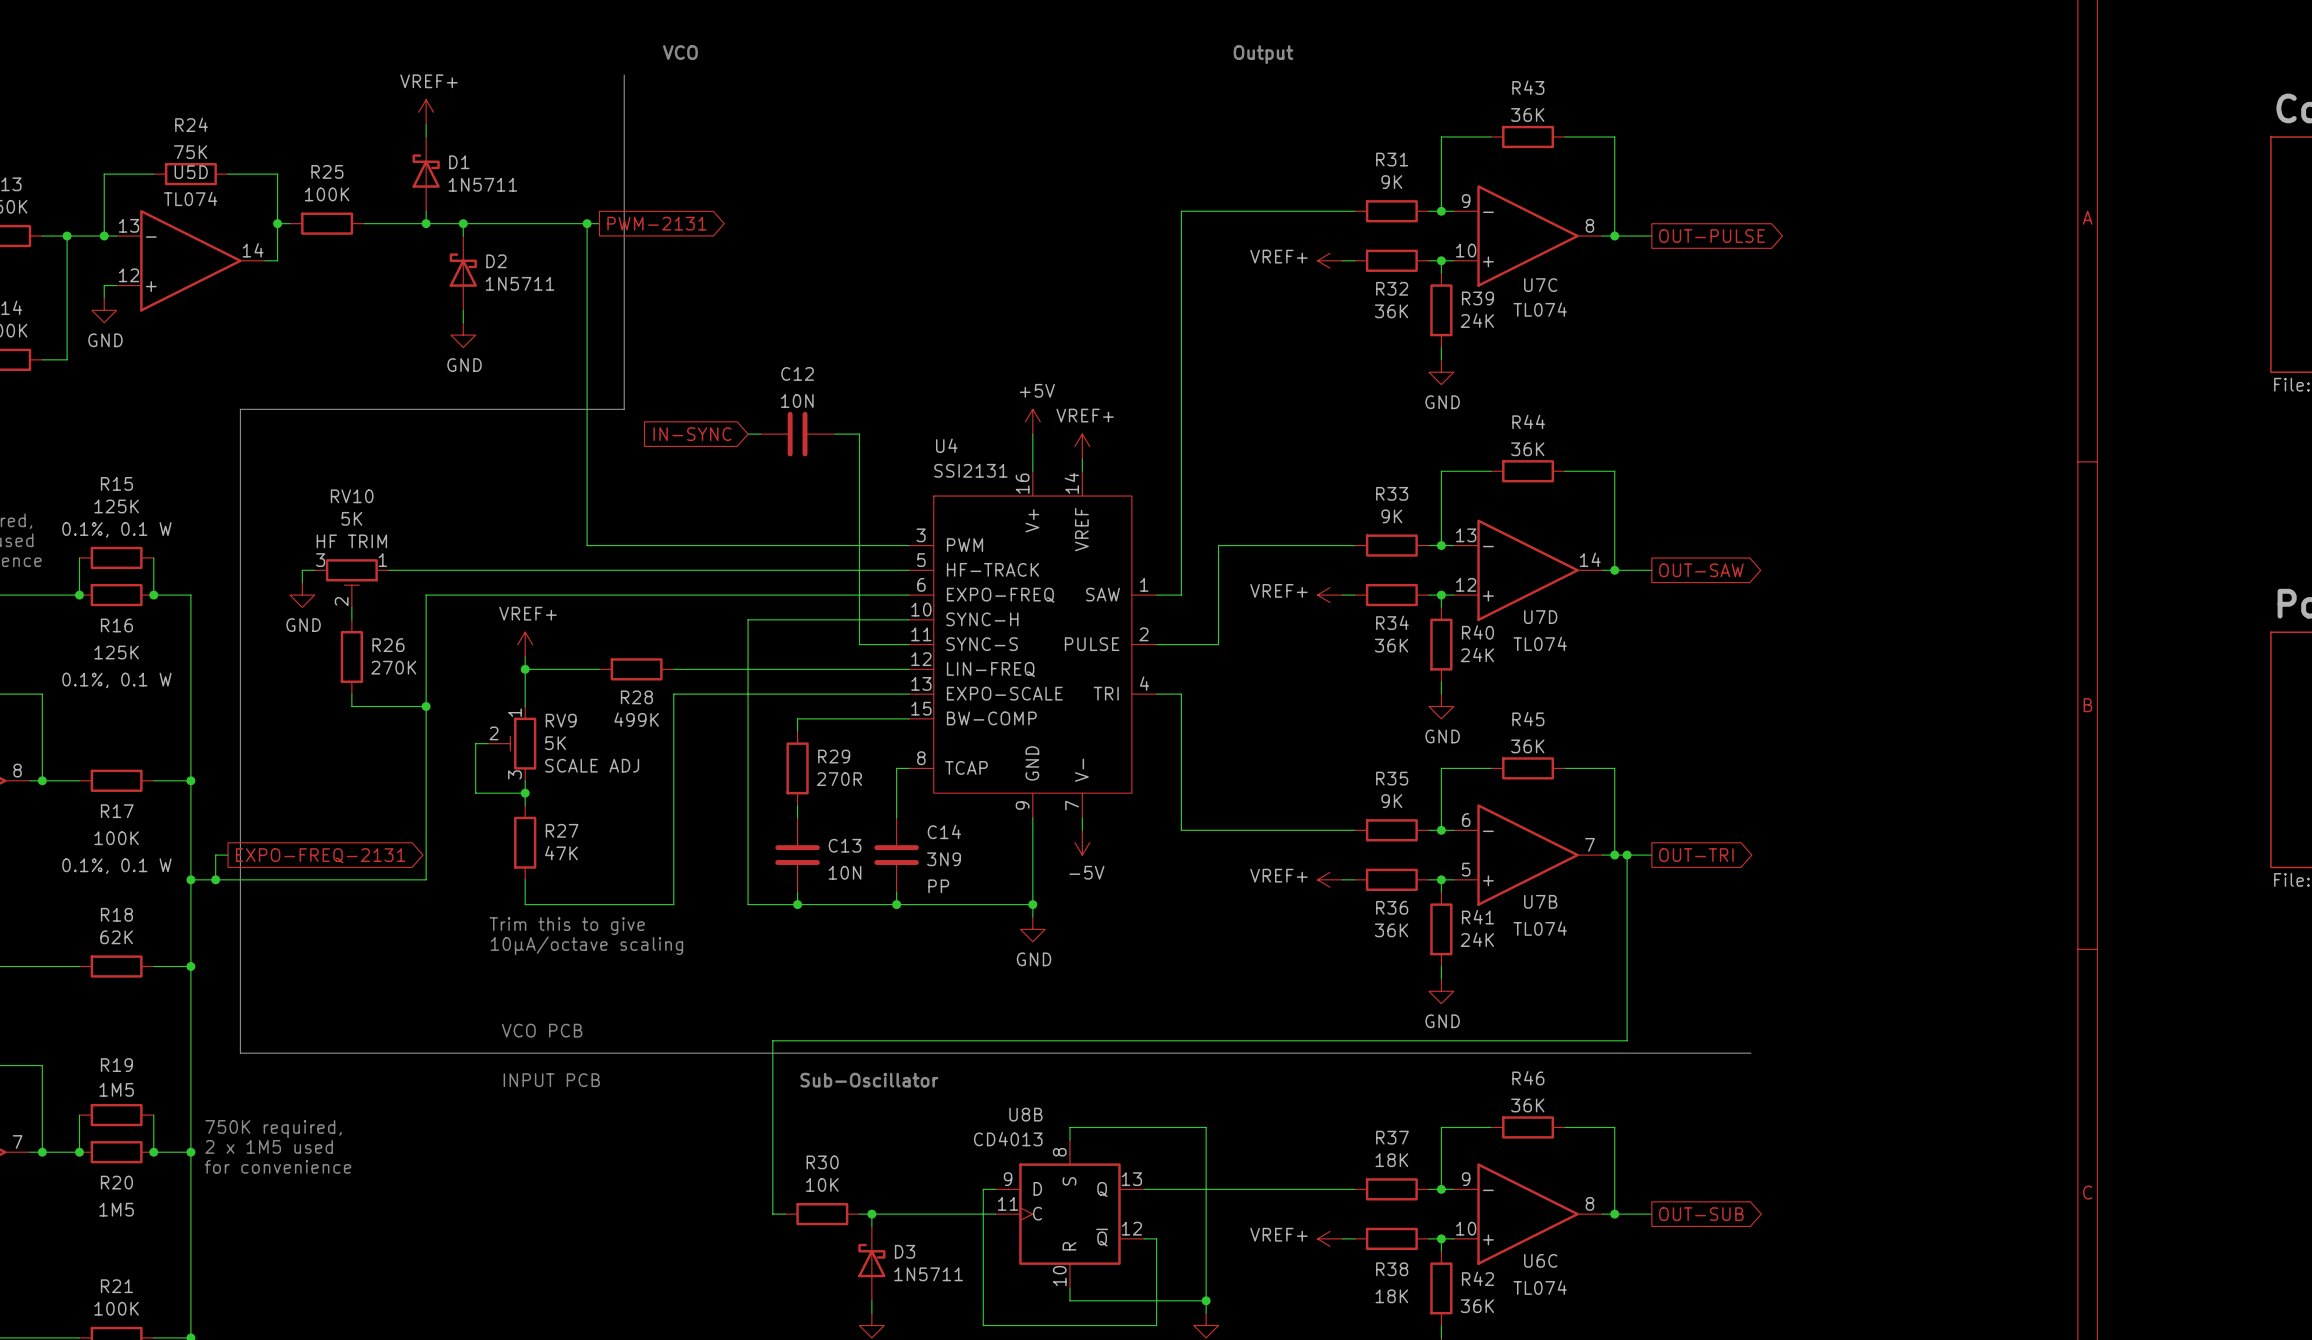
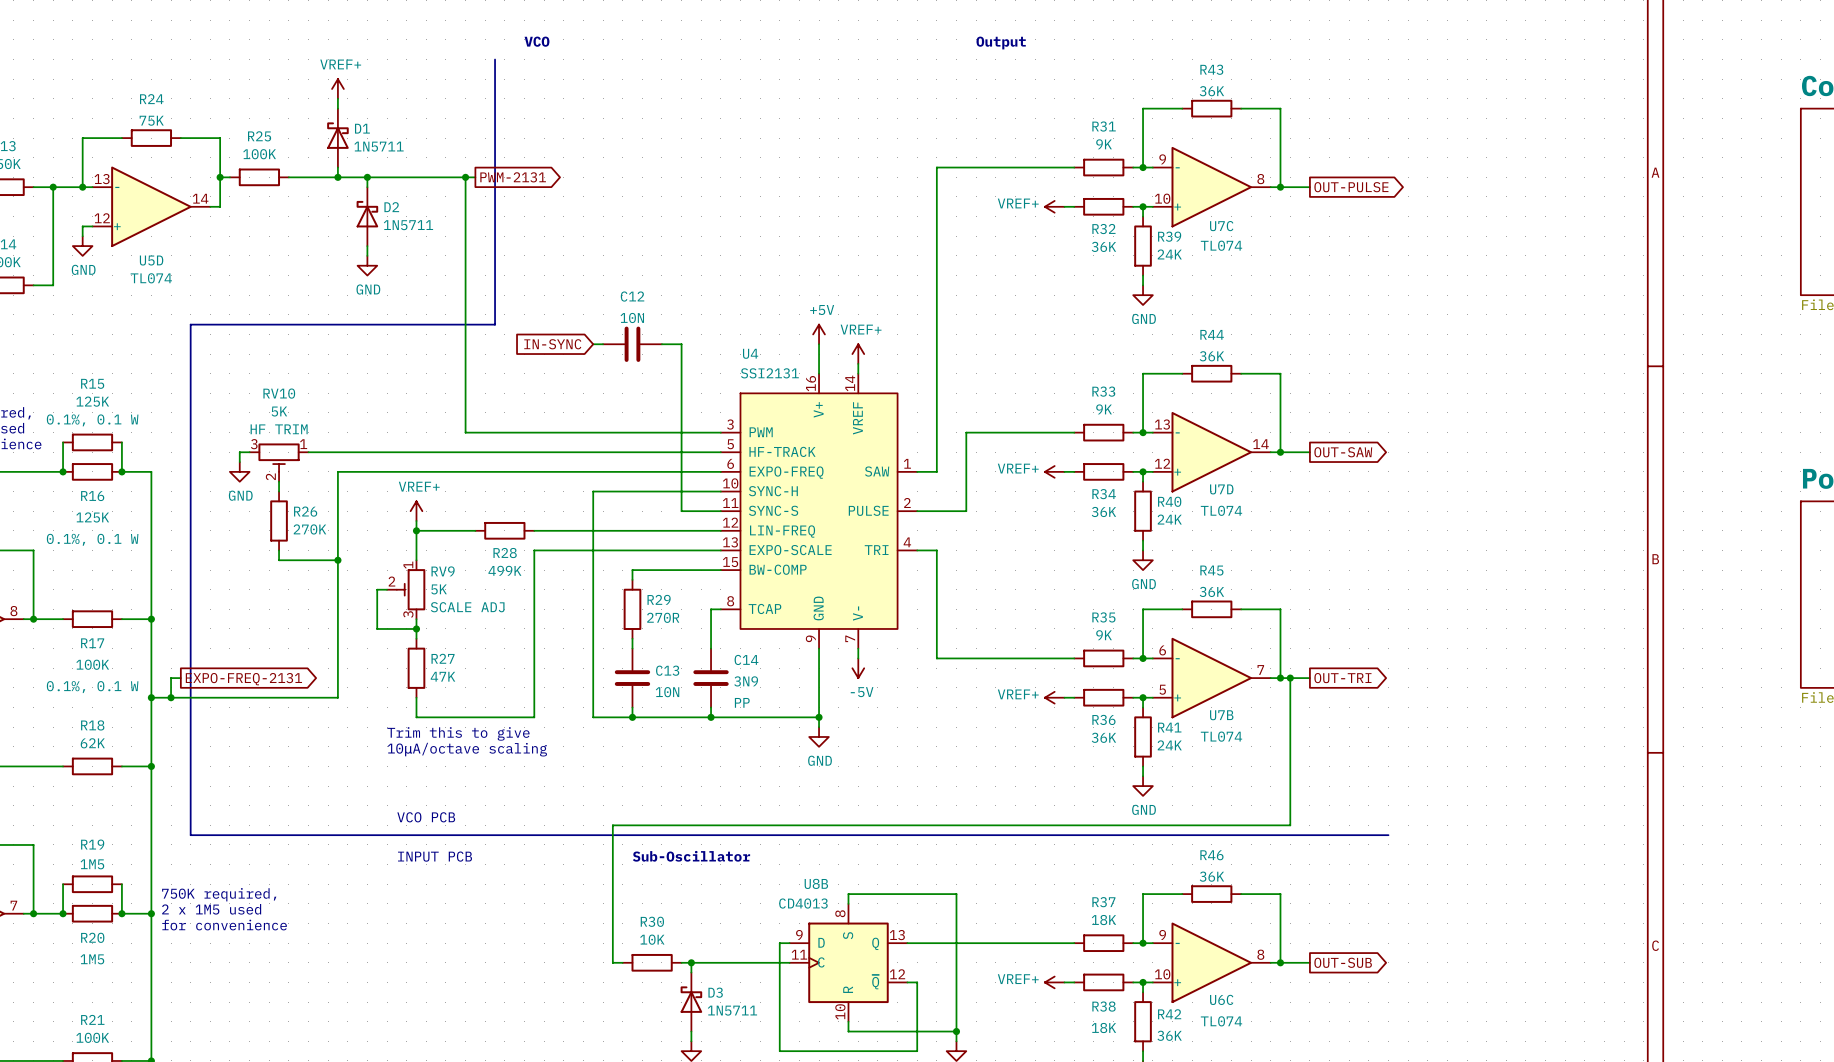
U5D name position: U5D (191, 172) -> U5D (151, 260)
U5D value position: TL074 (190, 198) -> TL074 (151, 278)

